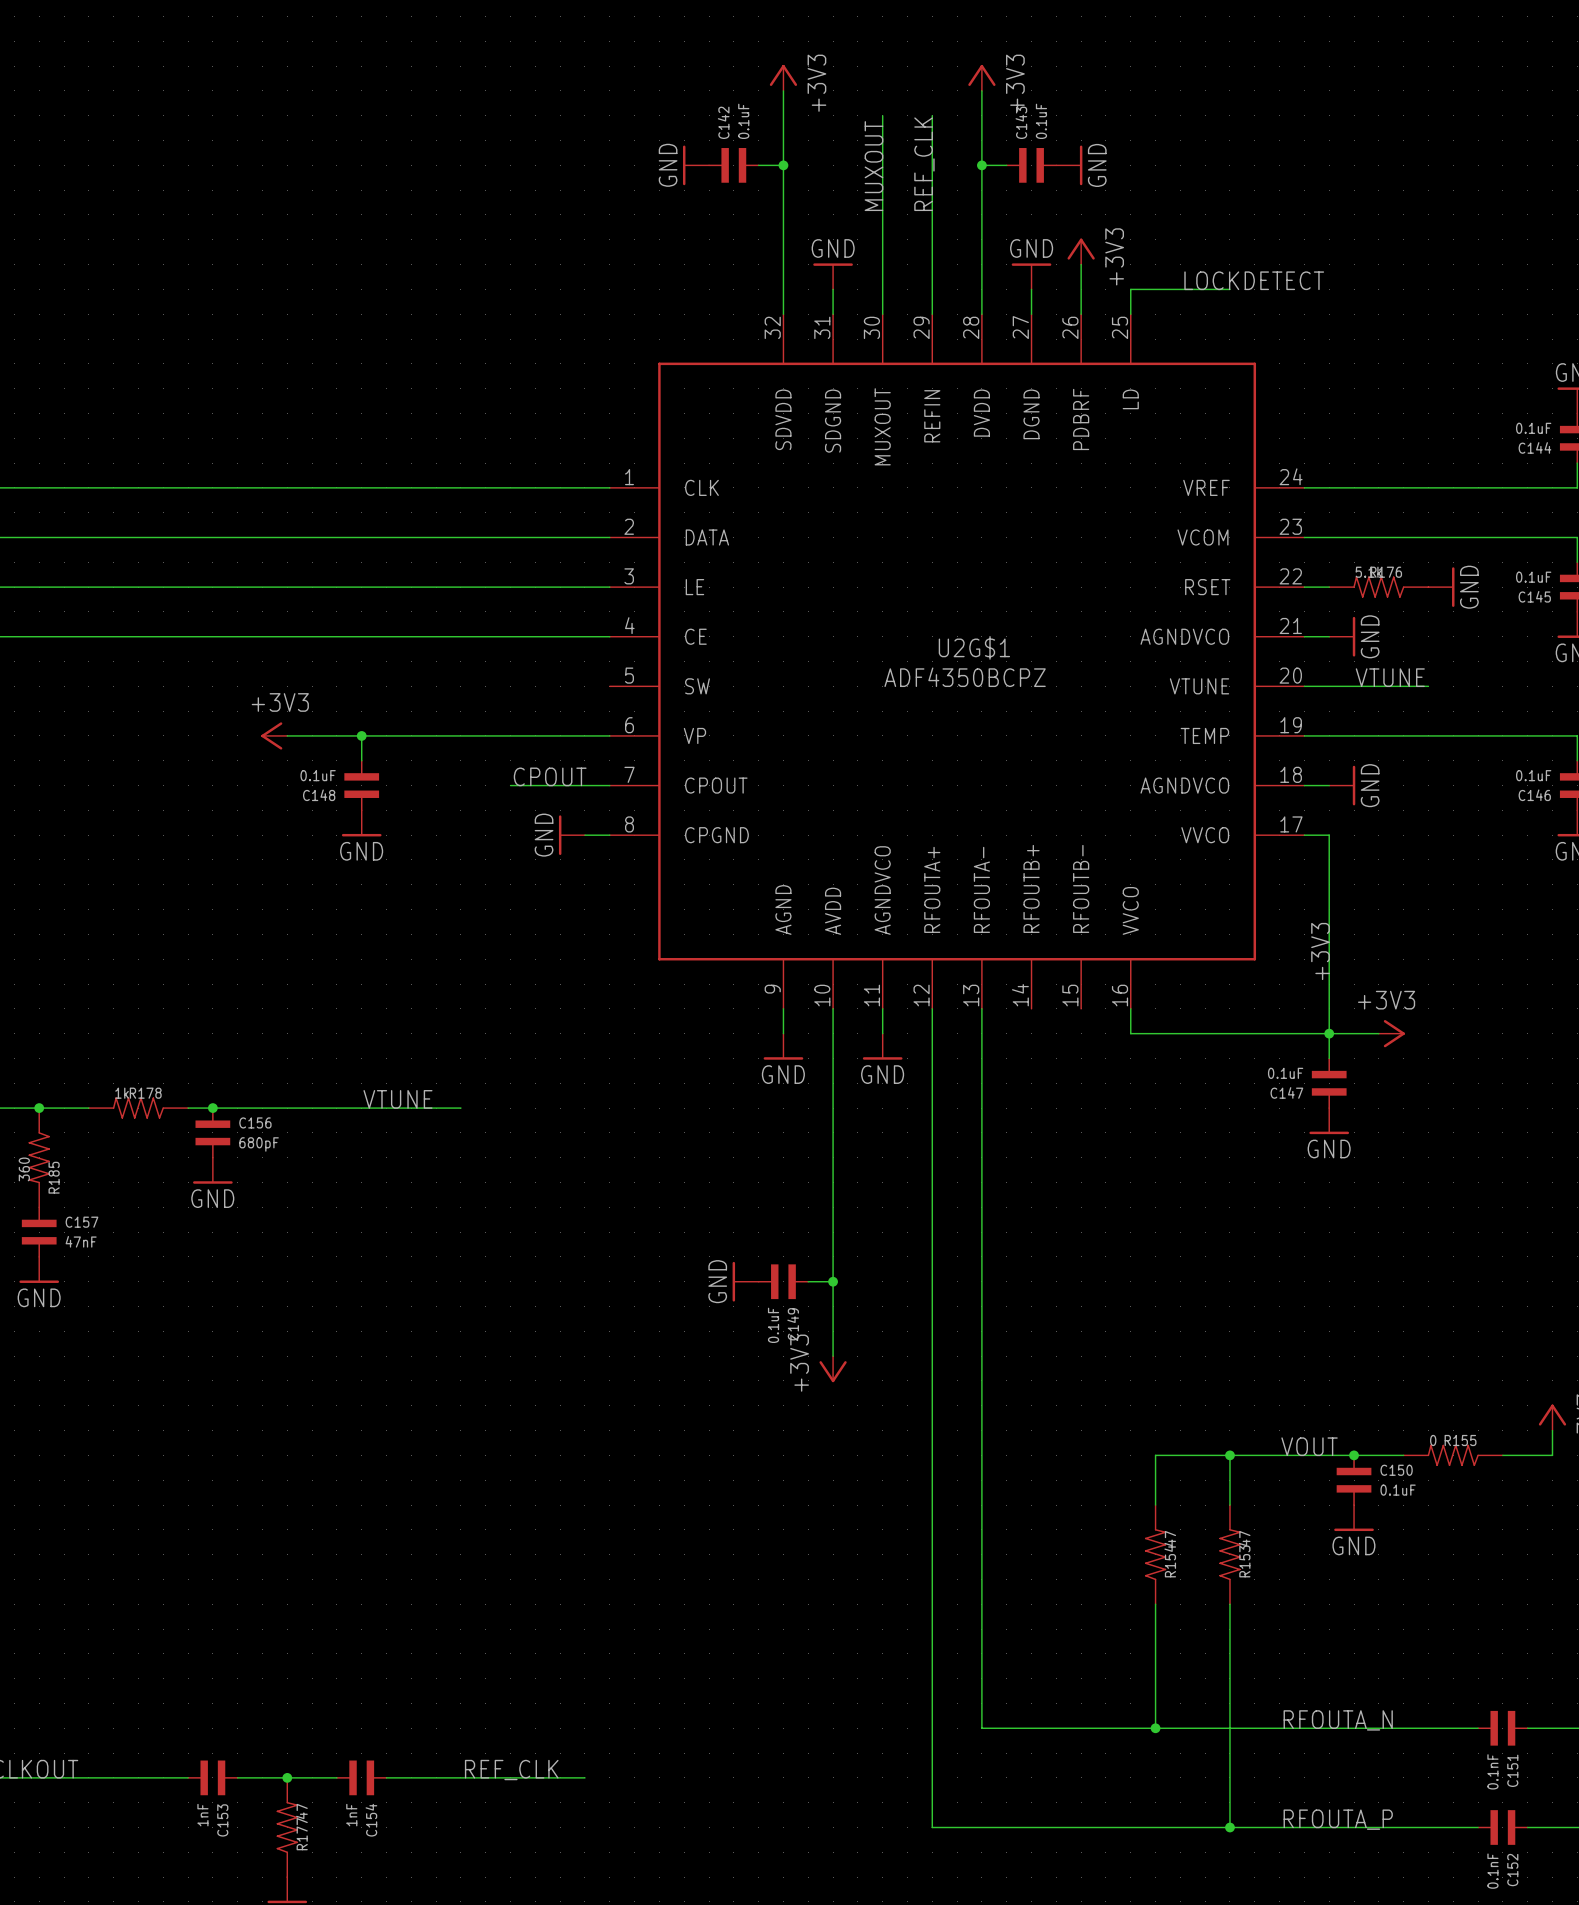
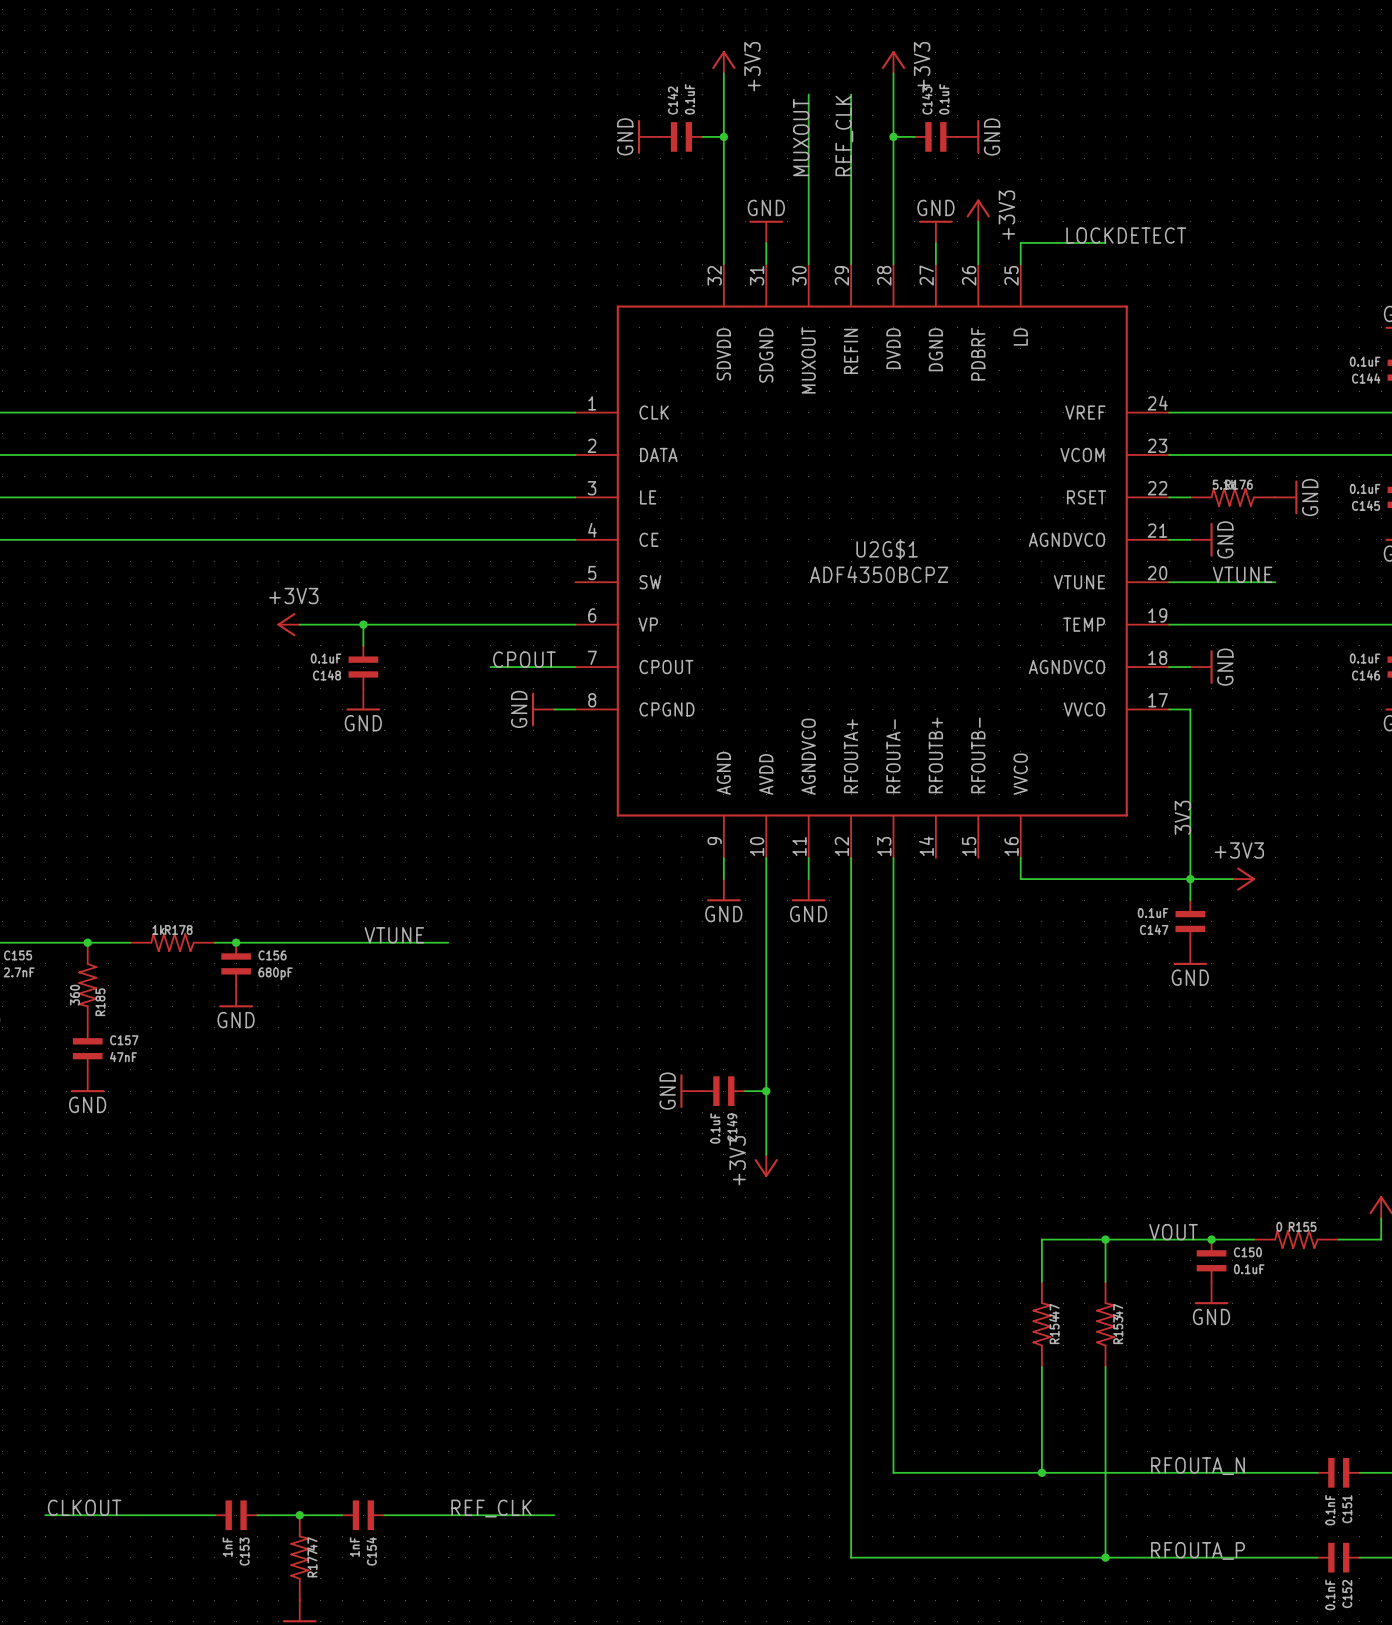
label: +3V3 (1320, 951) -> 3V3 (1182, 817)

